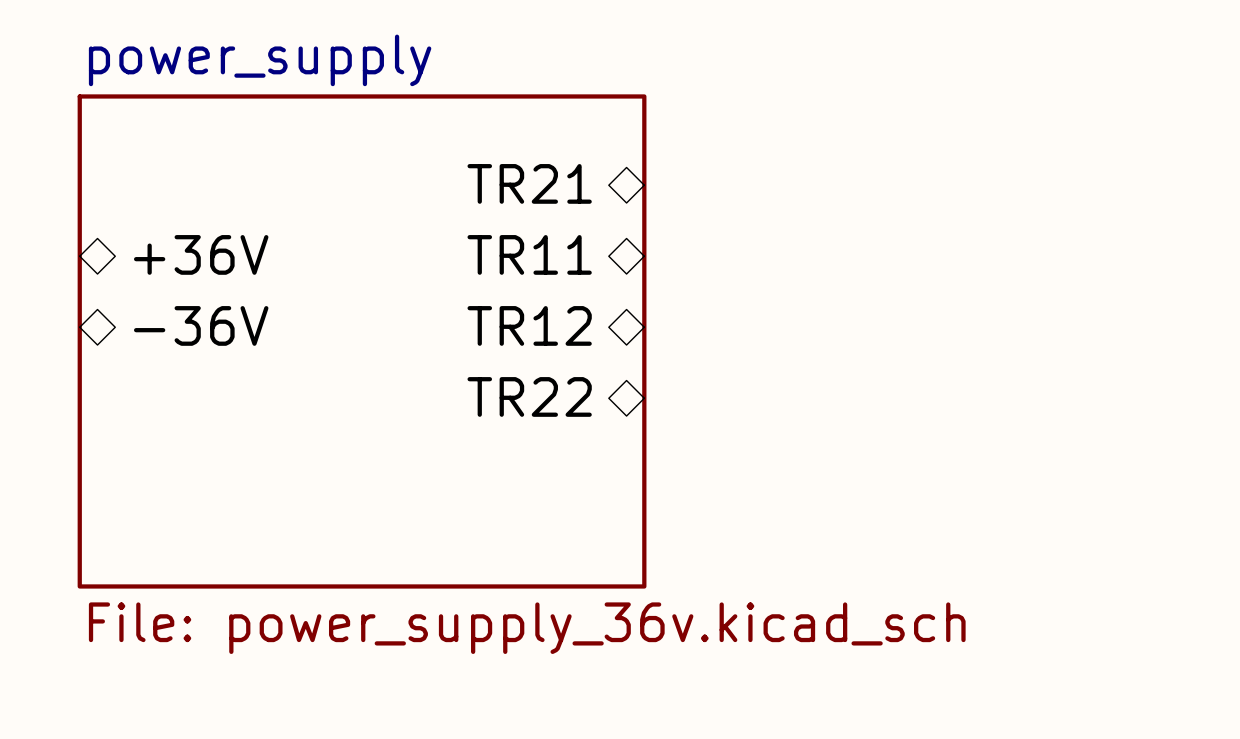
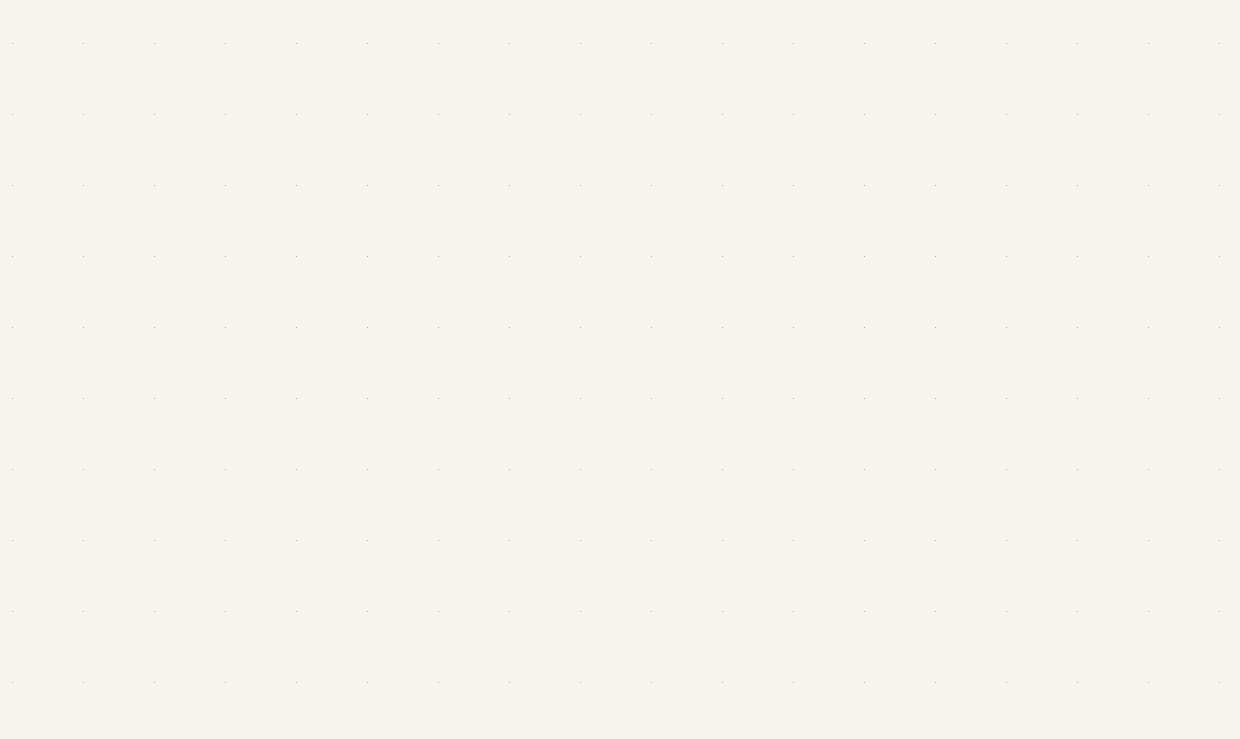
sheet pin: TR21 (529, 183) -> none
sheet pin: +36V (201, 254) -> none
sheet pin: TR11 (529, 254) -> none
sheet pin: -36V (201, 325) -> none
sheet pin: TR12 (529, 325) -> none
sheet power_supply: File: power_supply_36v.kicad_sch (362, 341) -> none
sheet pin: TR22 (529, 396) -> none

